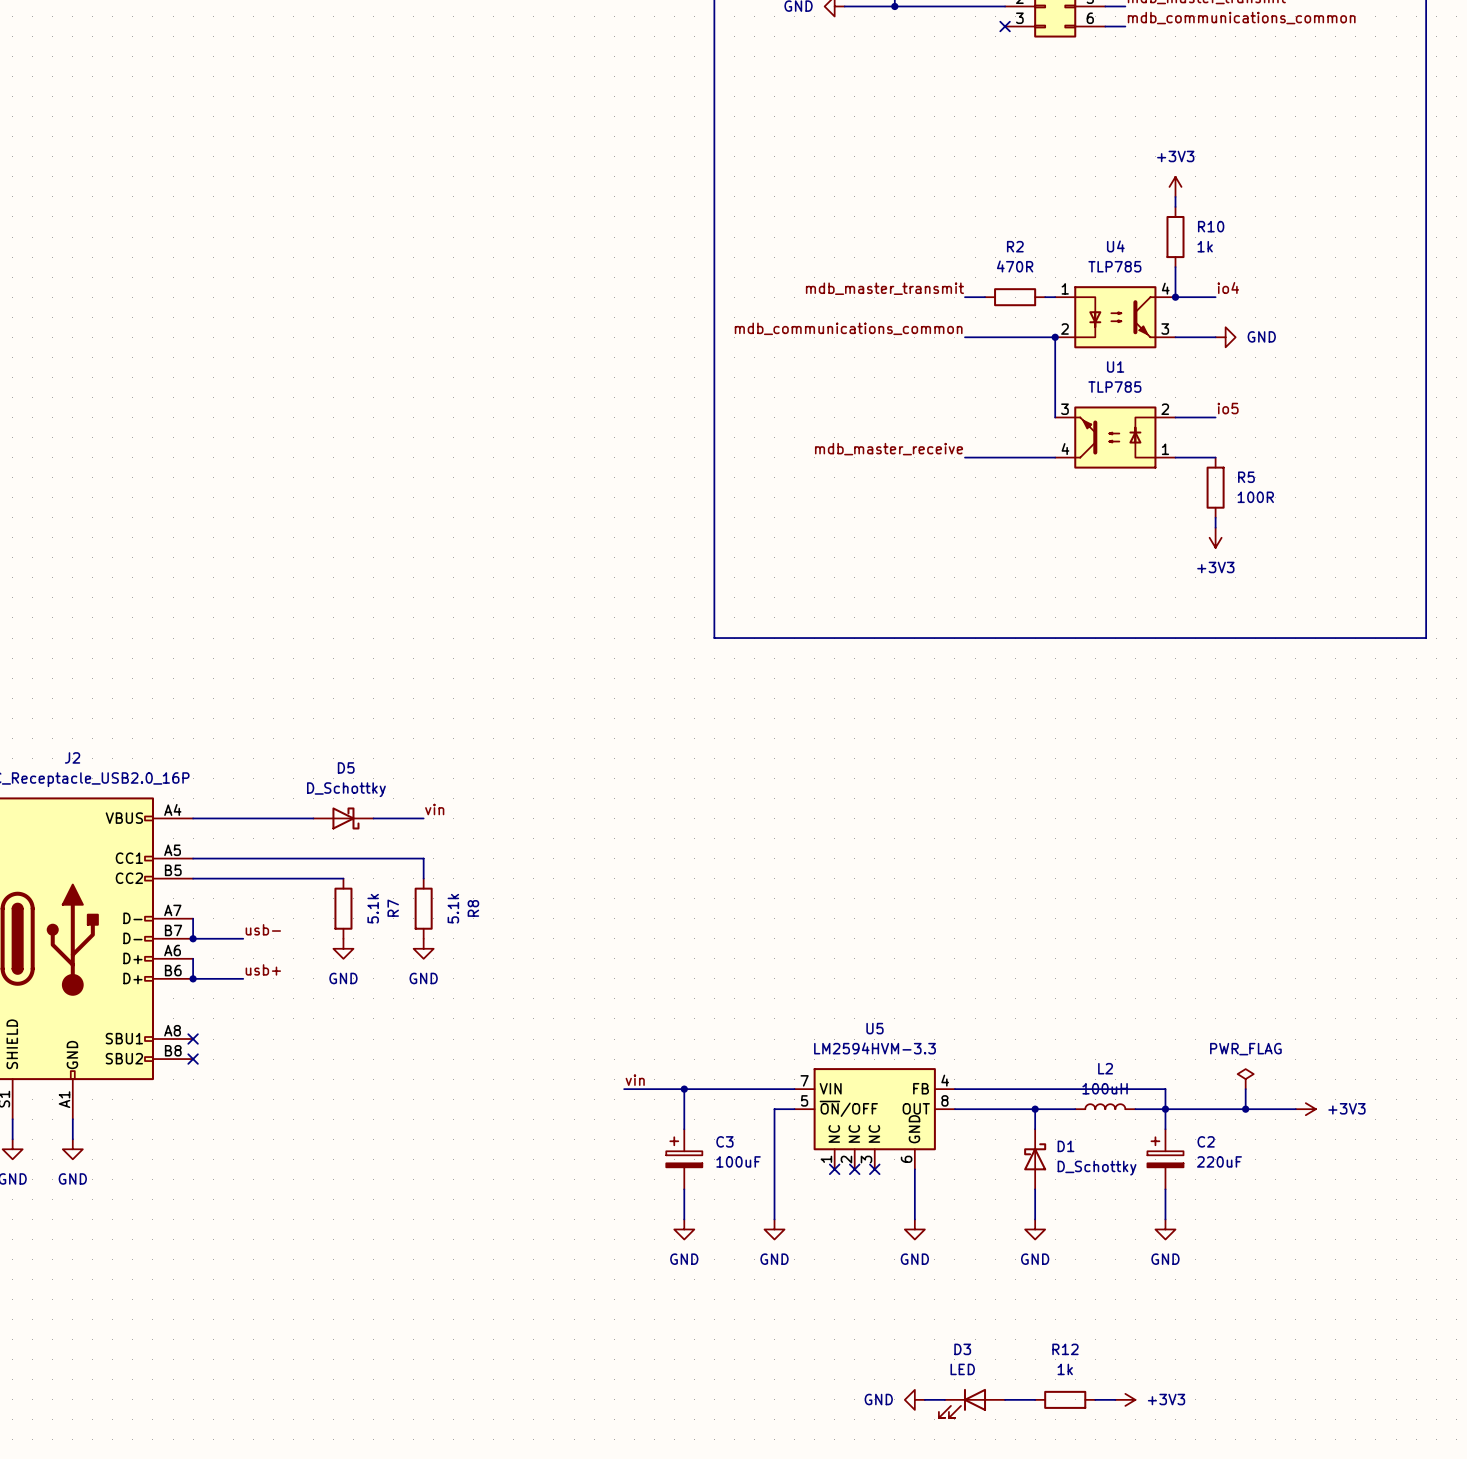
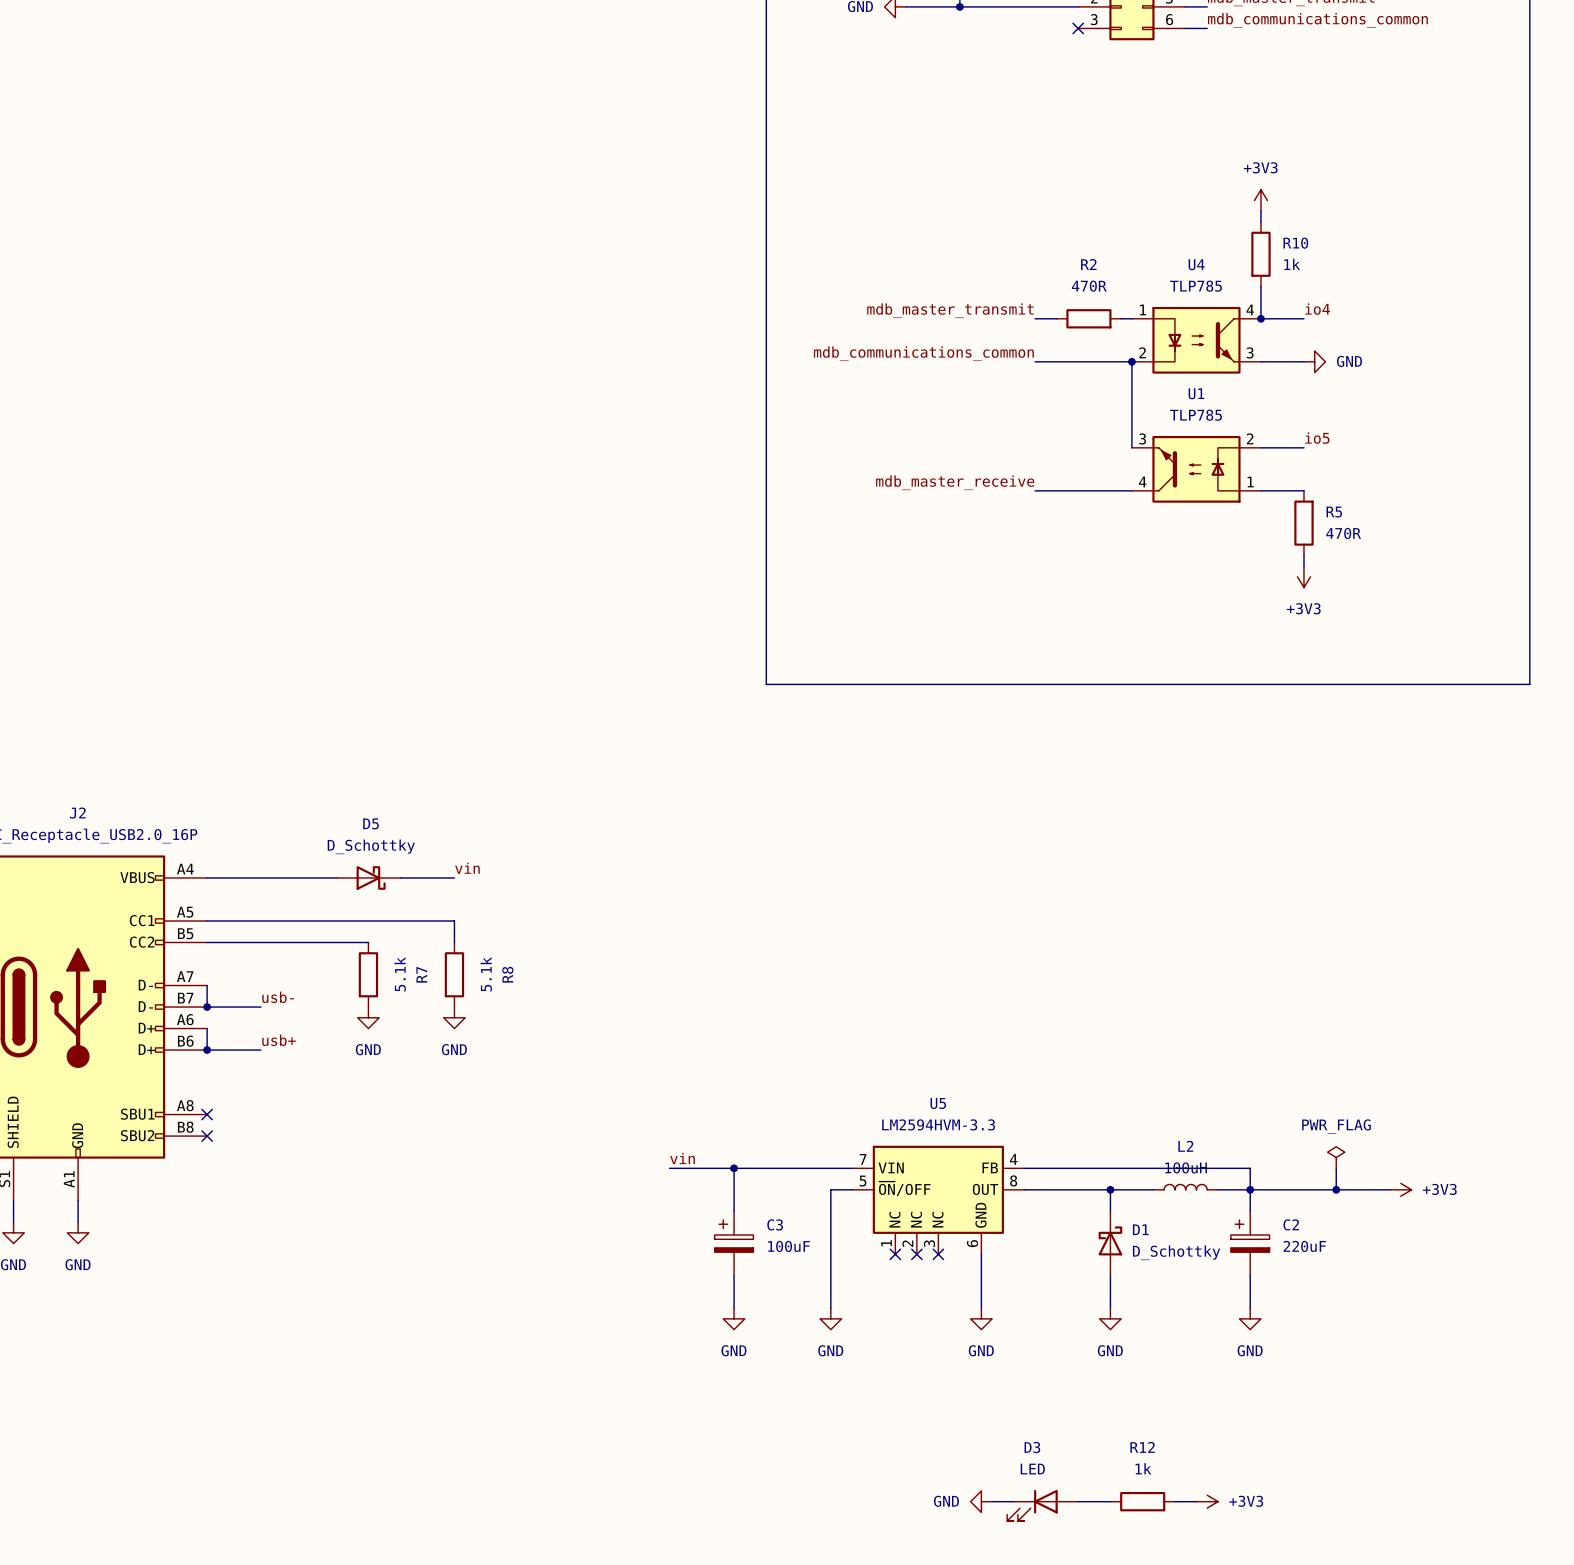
R5 value: 100R (1255, 497) -> 470R (1343, 533)

